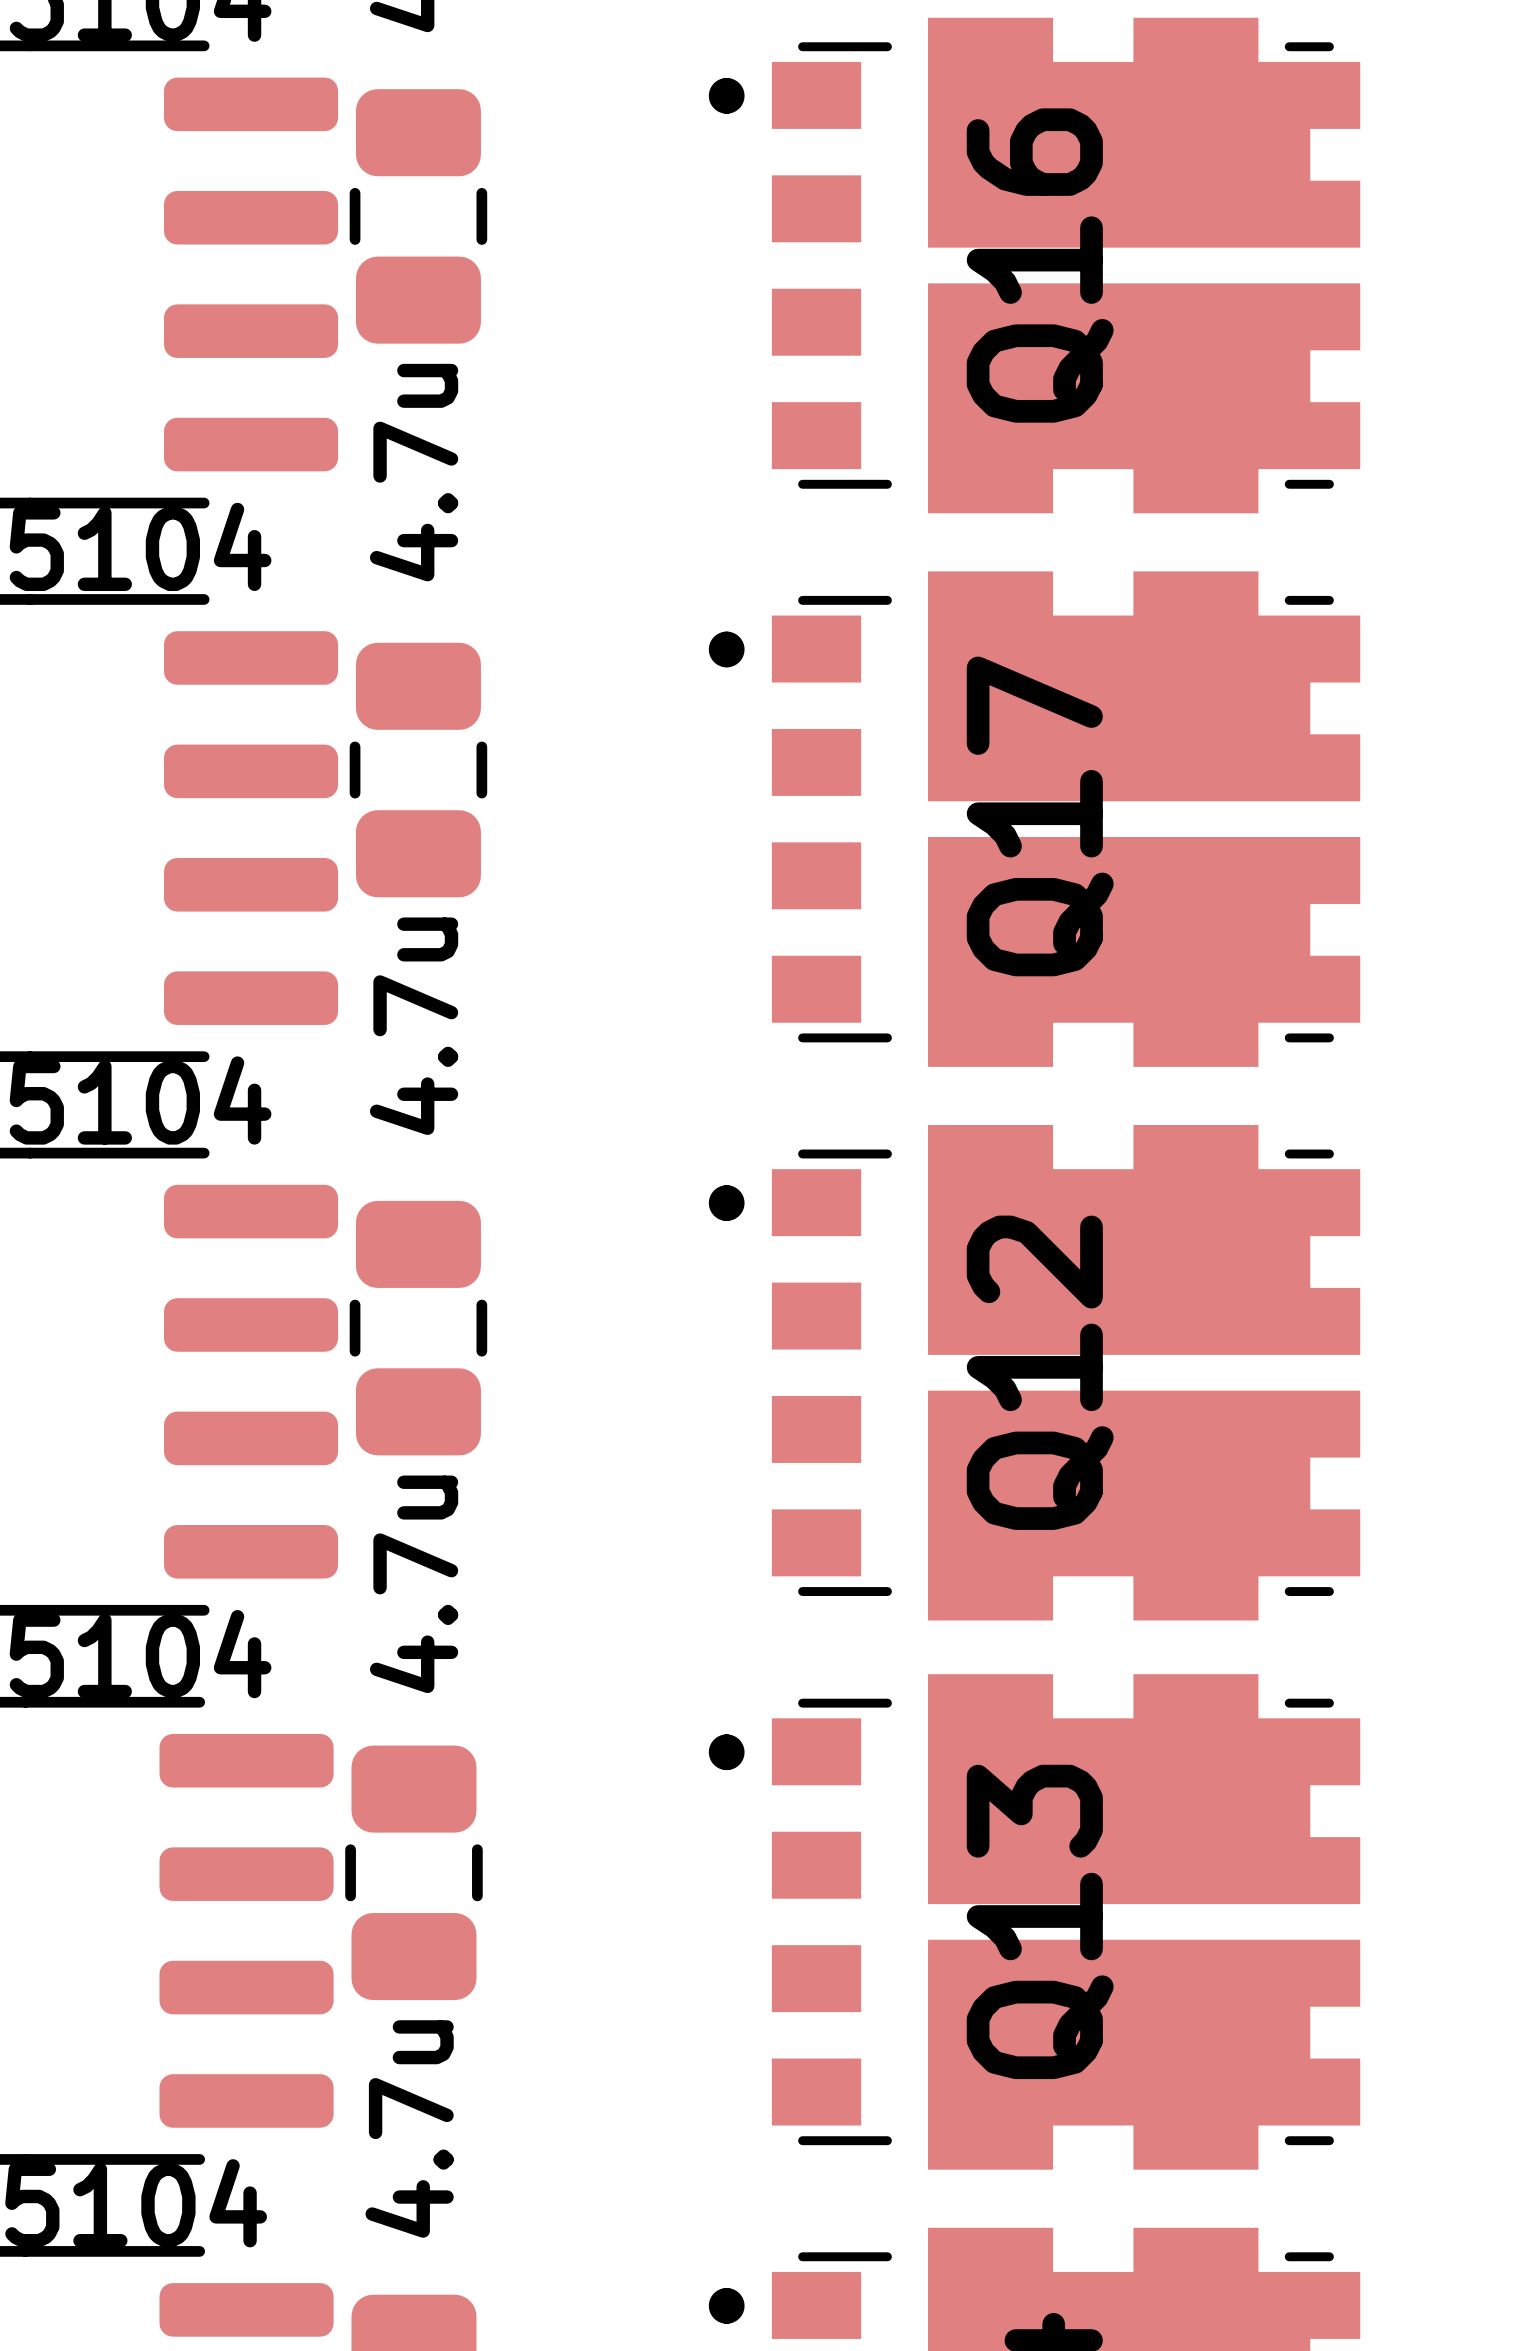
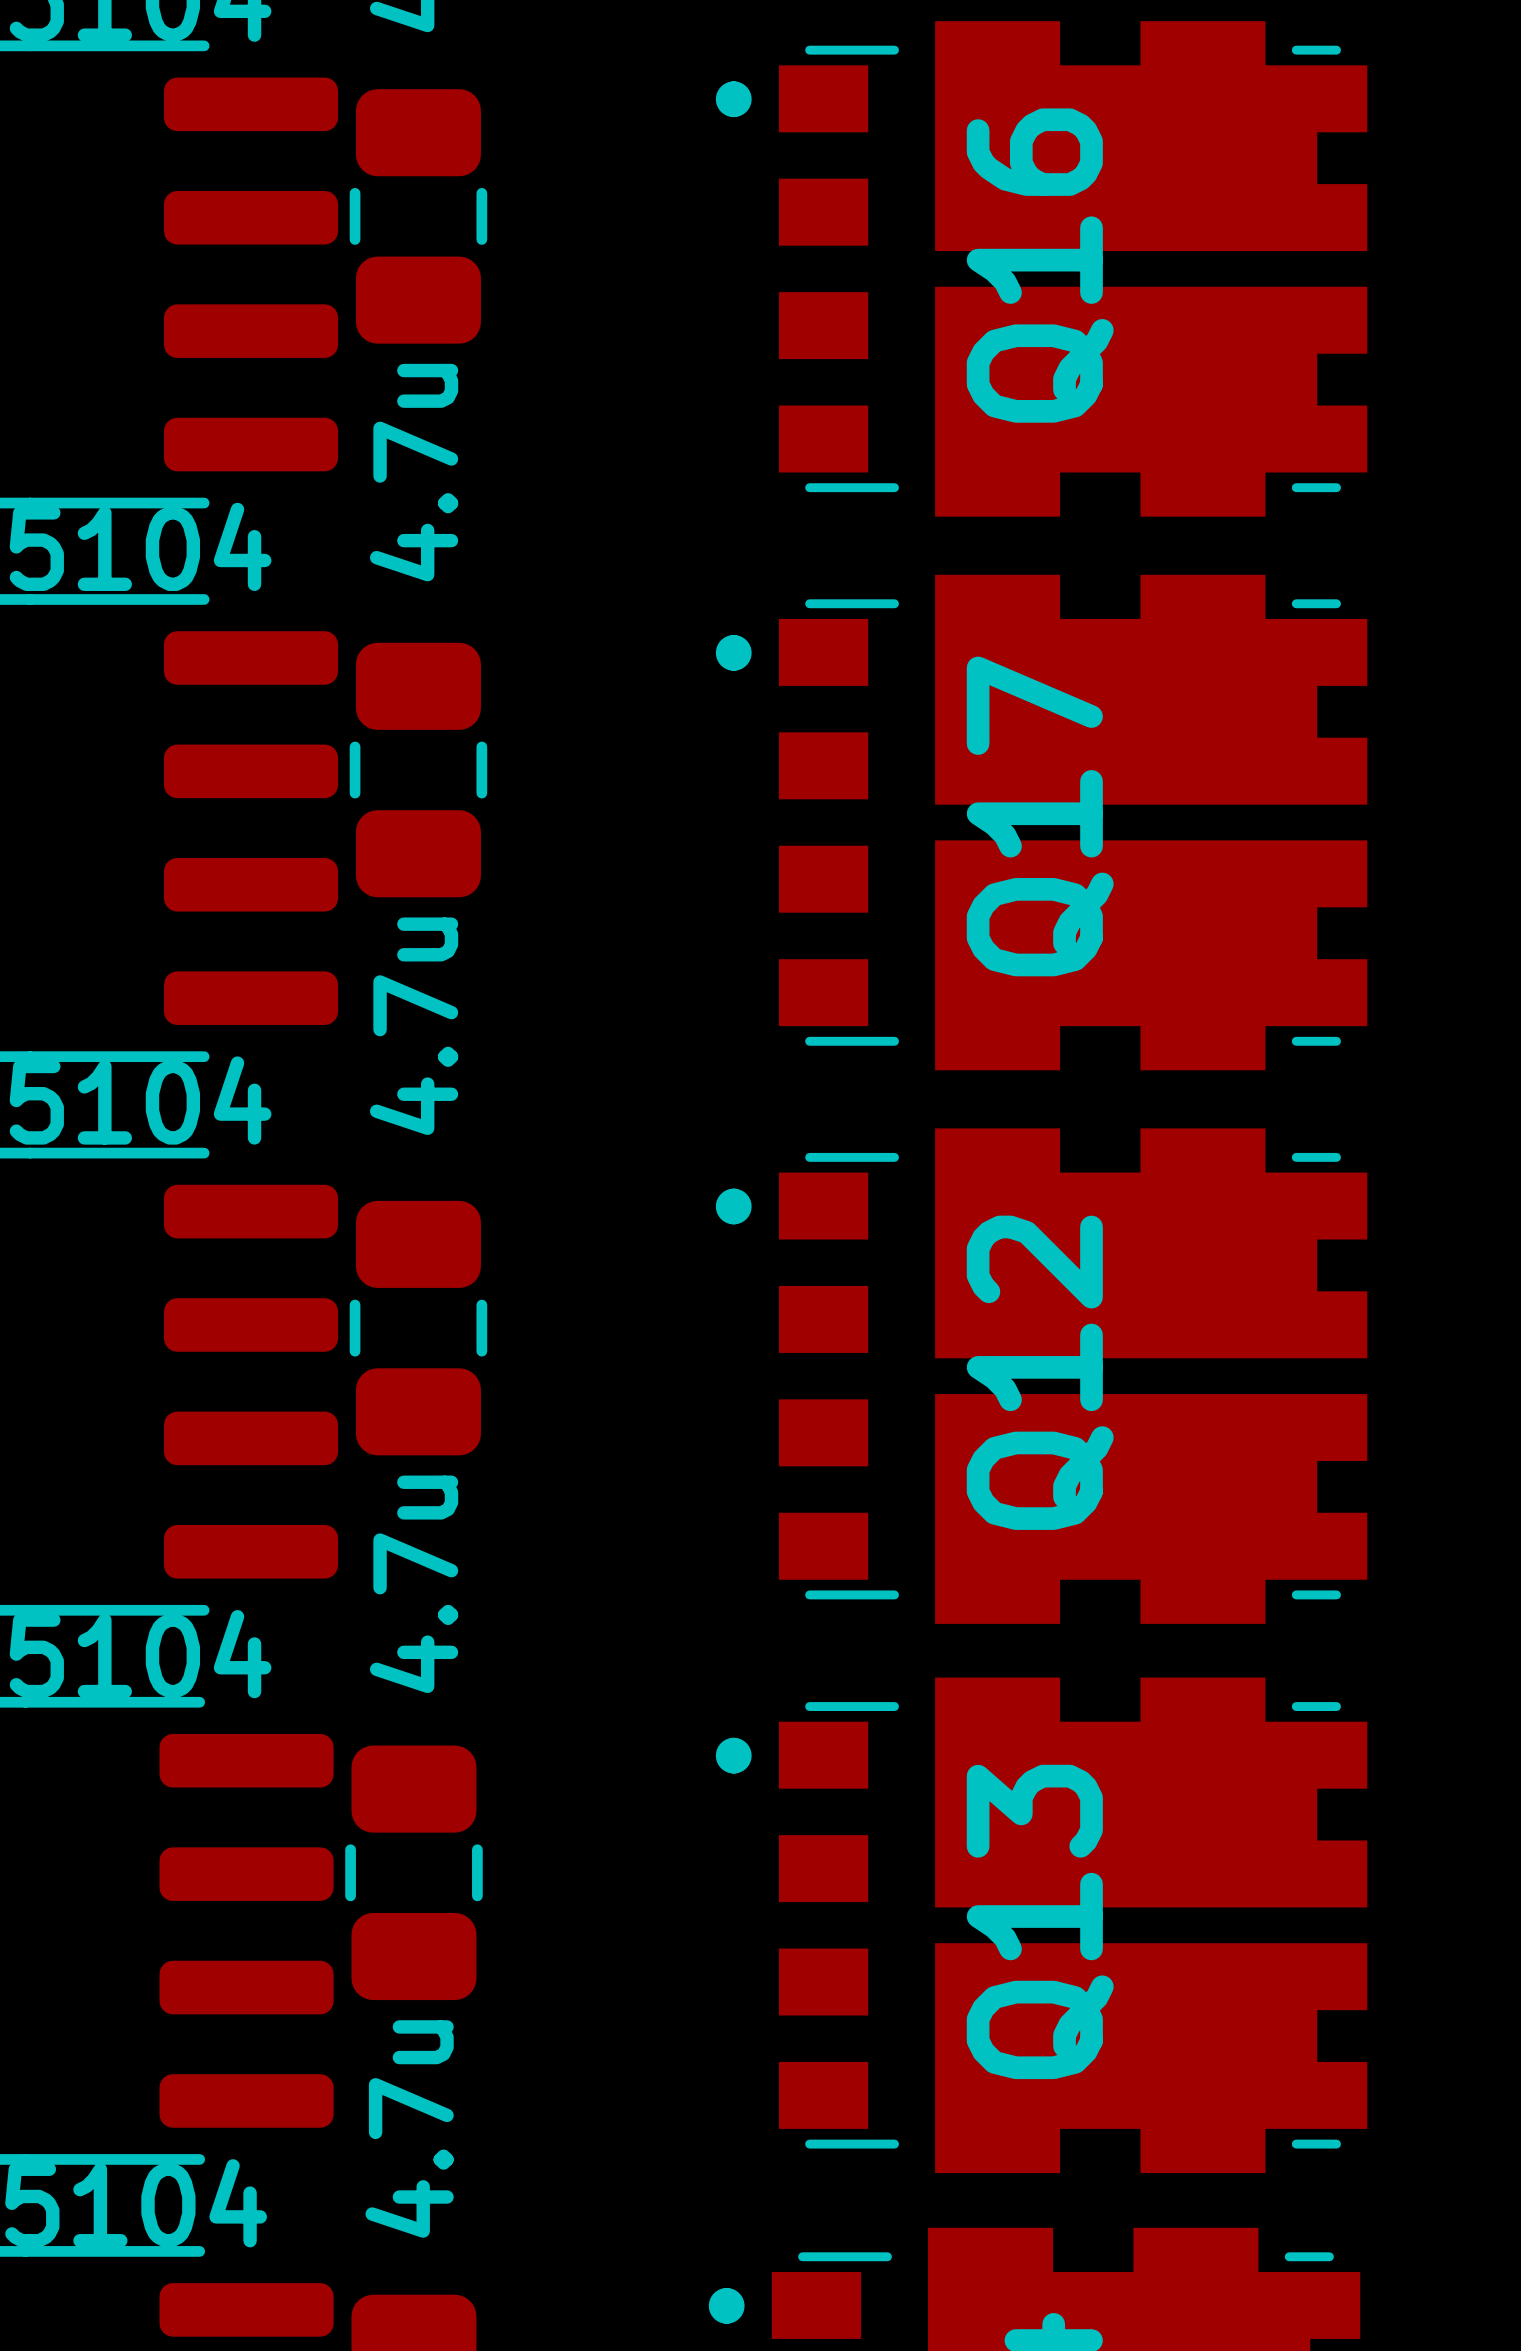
Q16 footprint: [708, 17, 1361, 514] -> [715, 21, 1368, 517]
Q17 footprint: [708, 571, 1361, 1067] -> [715, 574, 1368, 1071]
Q12 footprint: [708, 1125, 1361, 1621] -> [715, 1128, 1368, 1624]
Q13 footprint: [708, 1674, 1361, 2170] -> [715, 1677, 1368, 2174]

